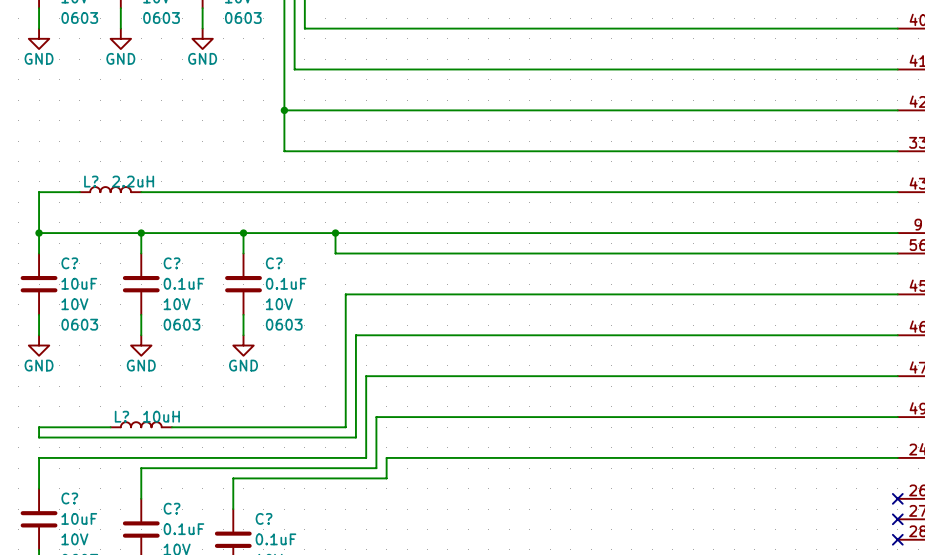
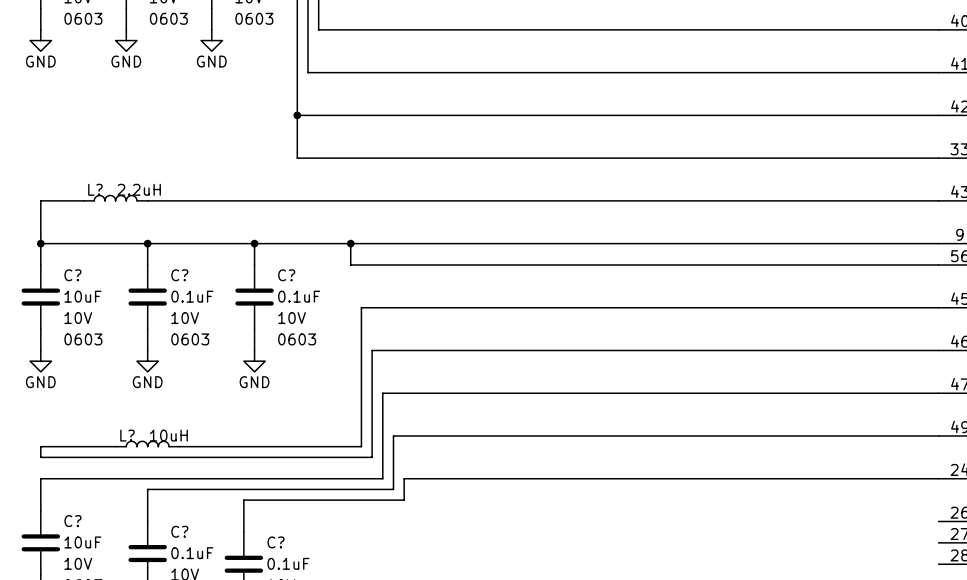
no-connect mark: (897, 498) -> none
no-connect mark: (897, 519) -> none
no-connect mark: (897, 539) -> none

